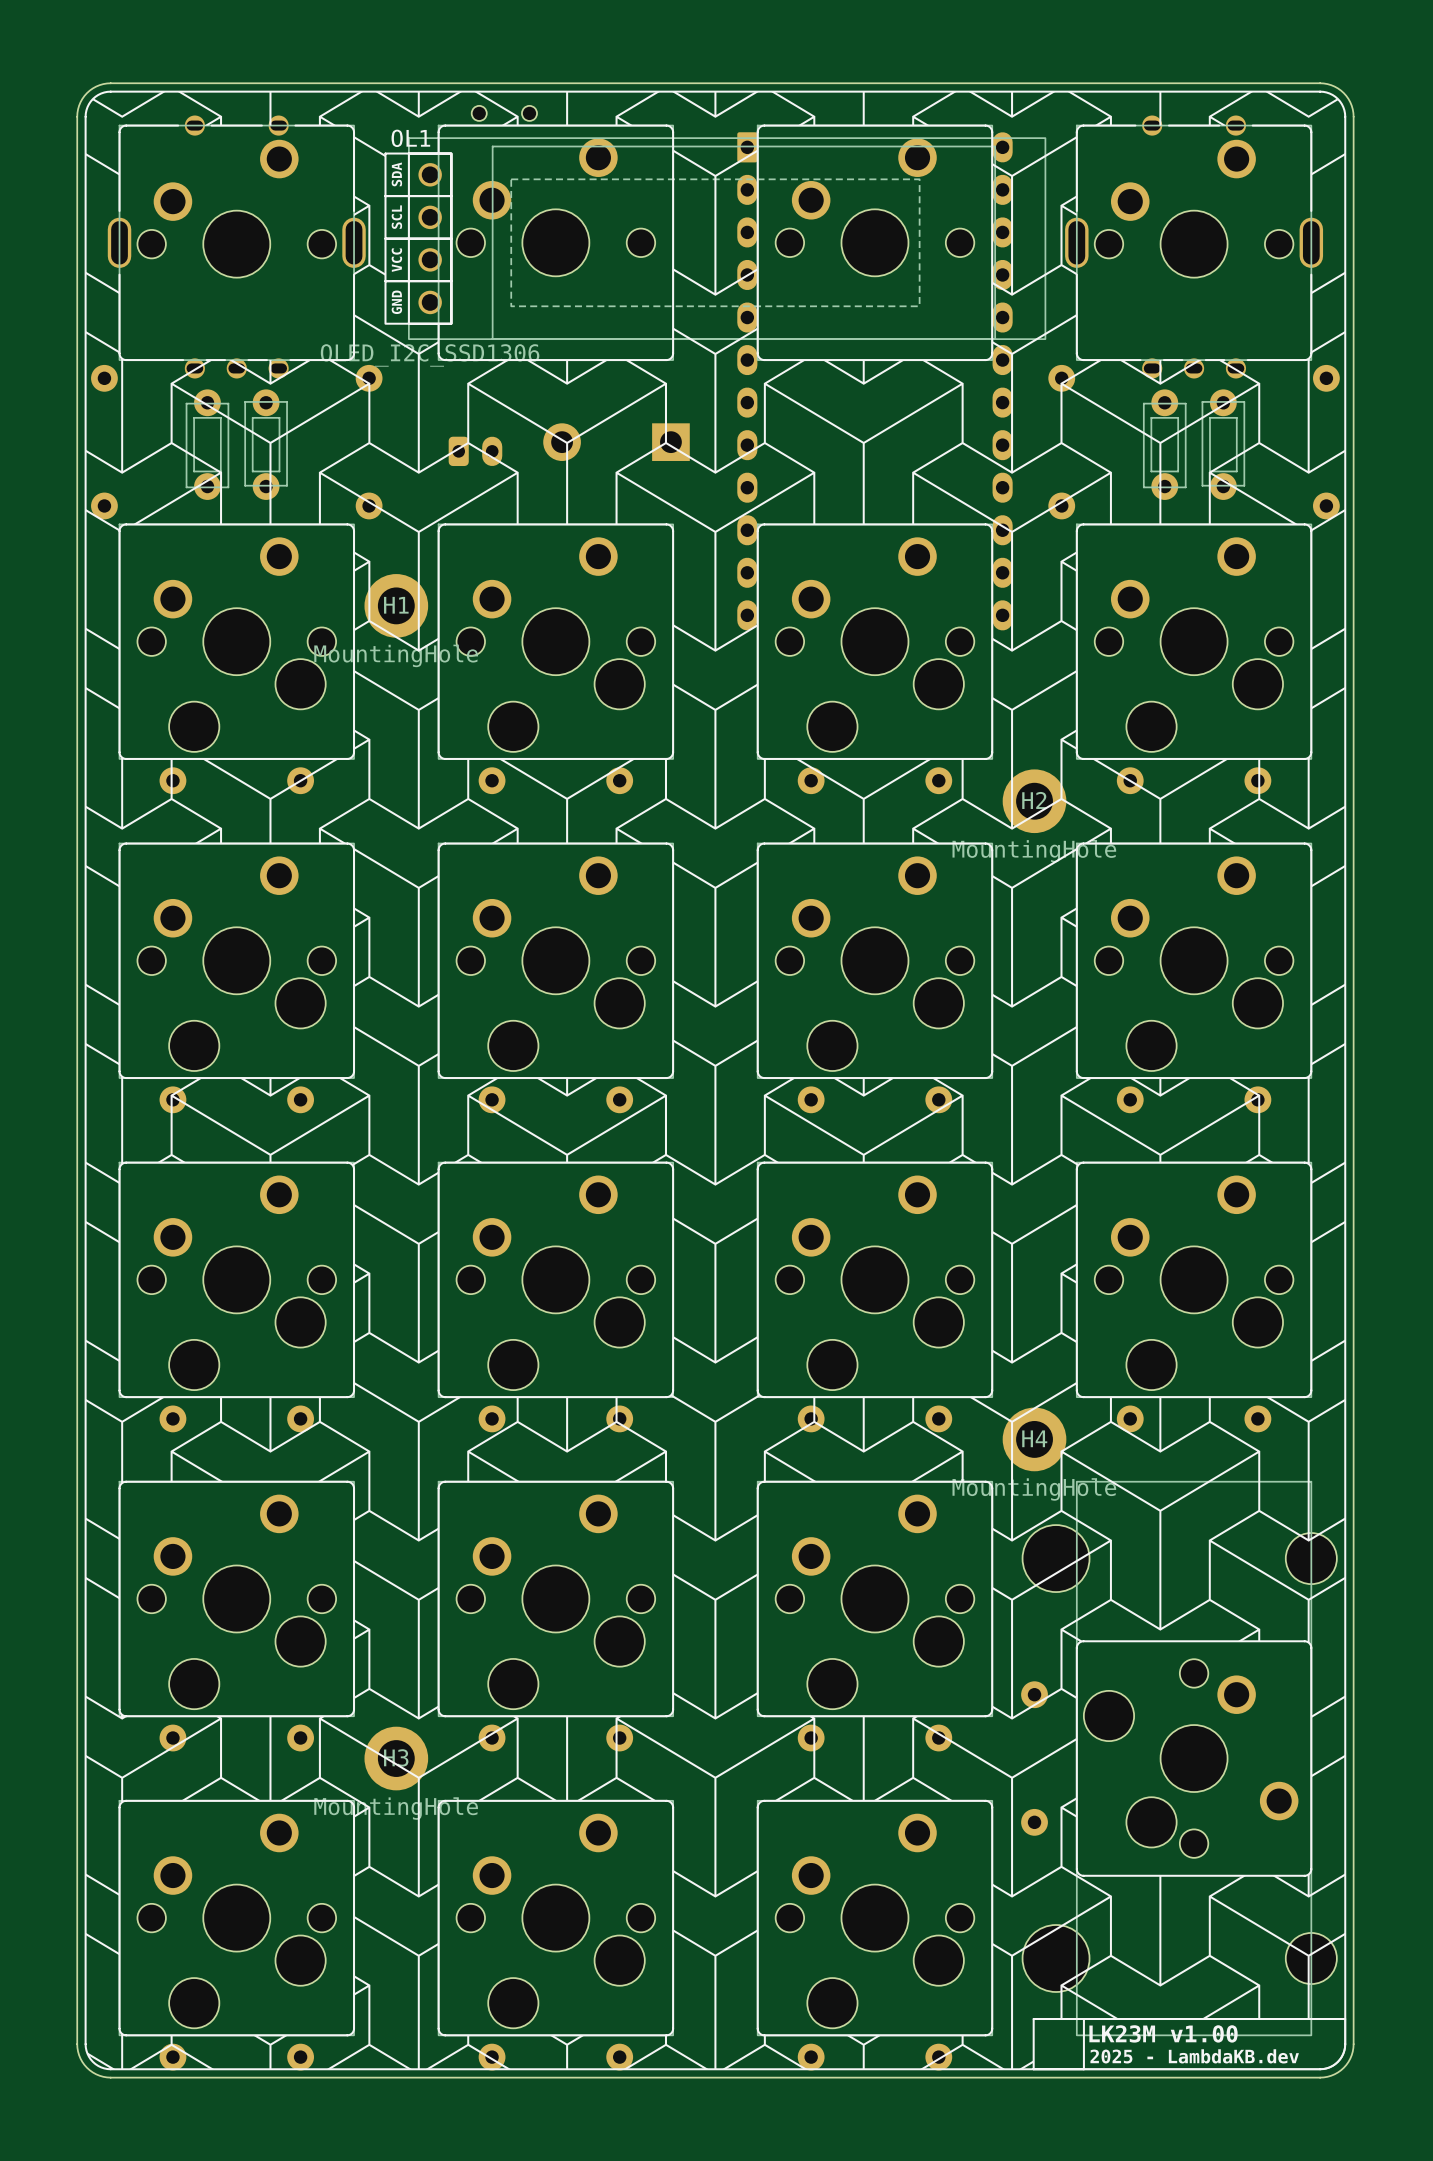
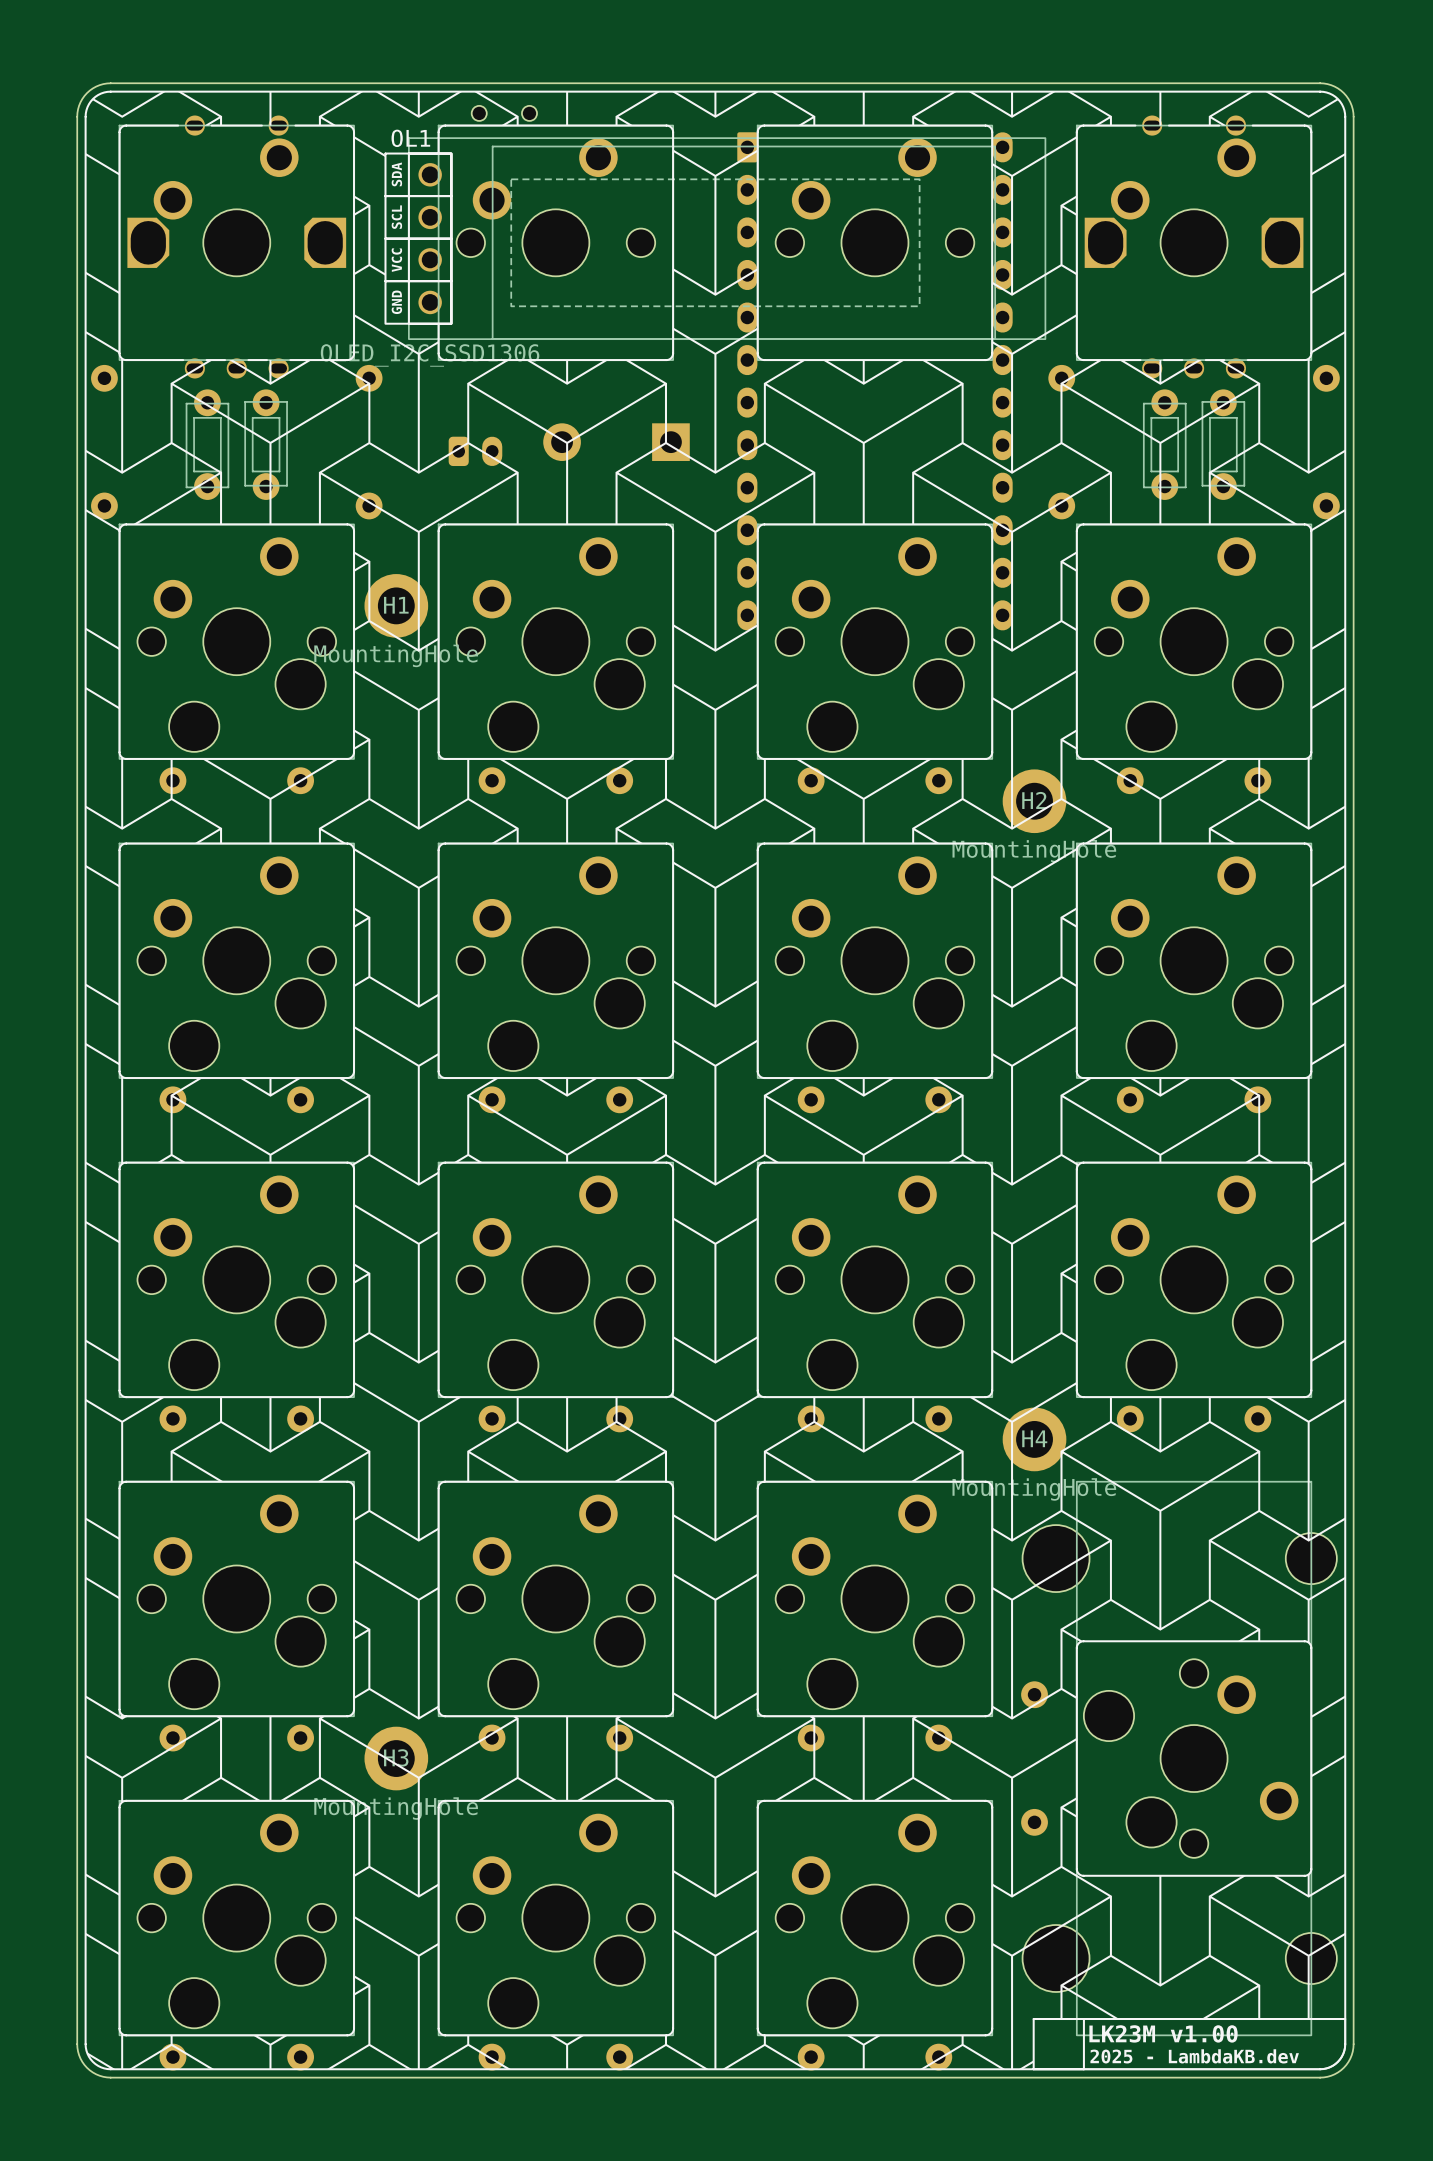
part footprint: [107, 115, 366, 379] -> [118, 115, 356, 379]
part footprint: [1065, 115, 1324, 379] -> [1075, 115, 1313, 379]

